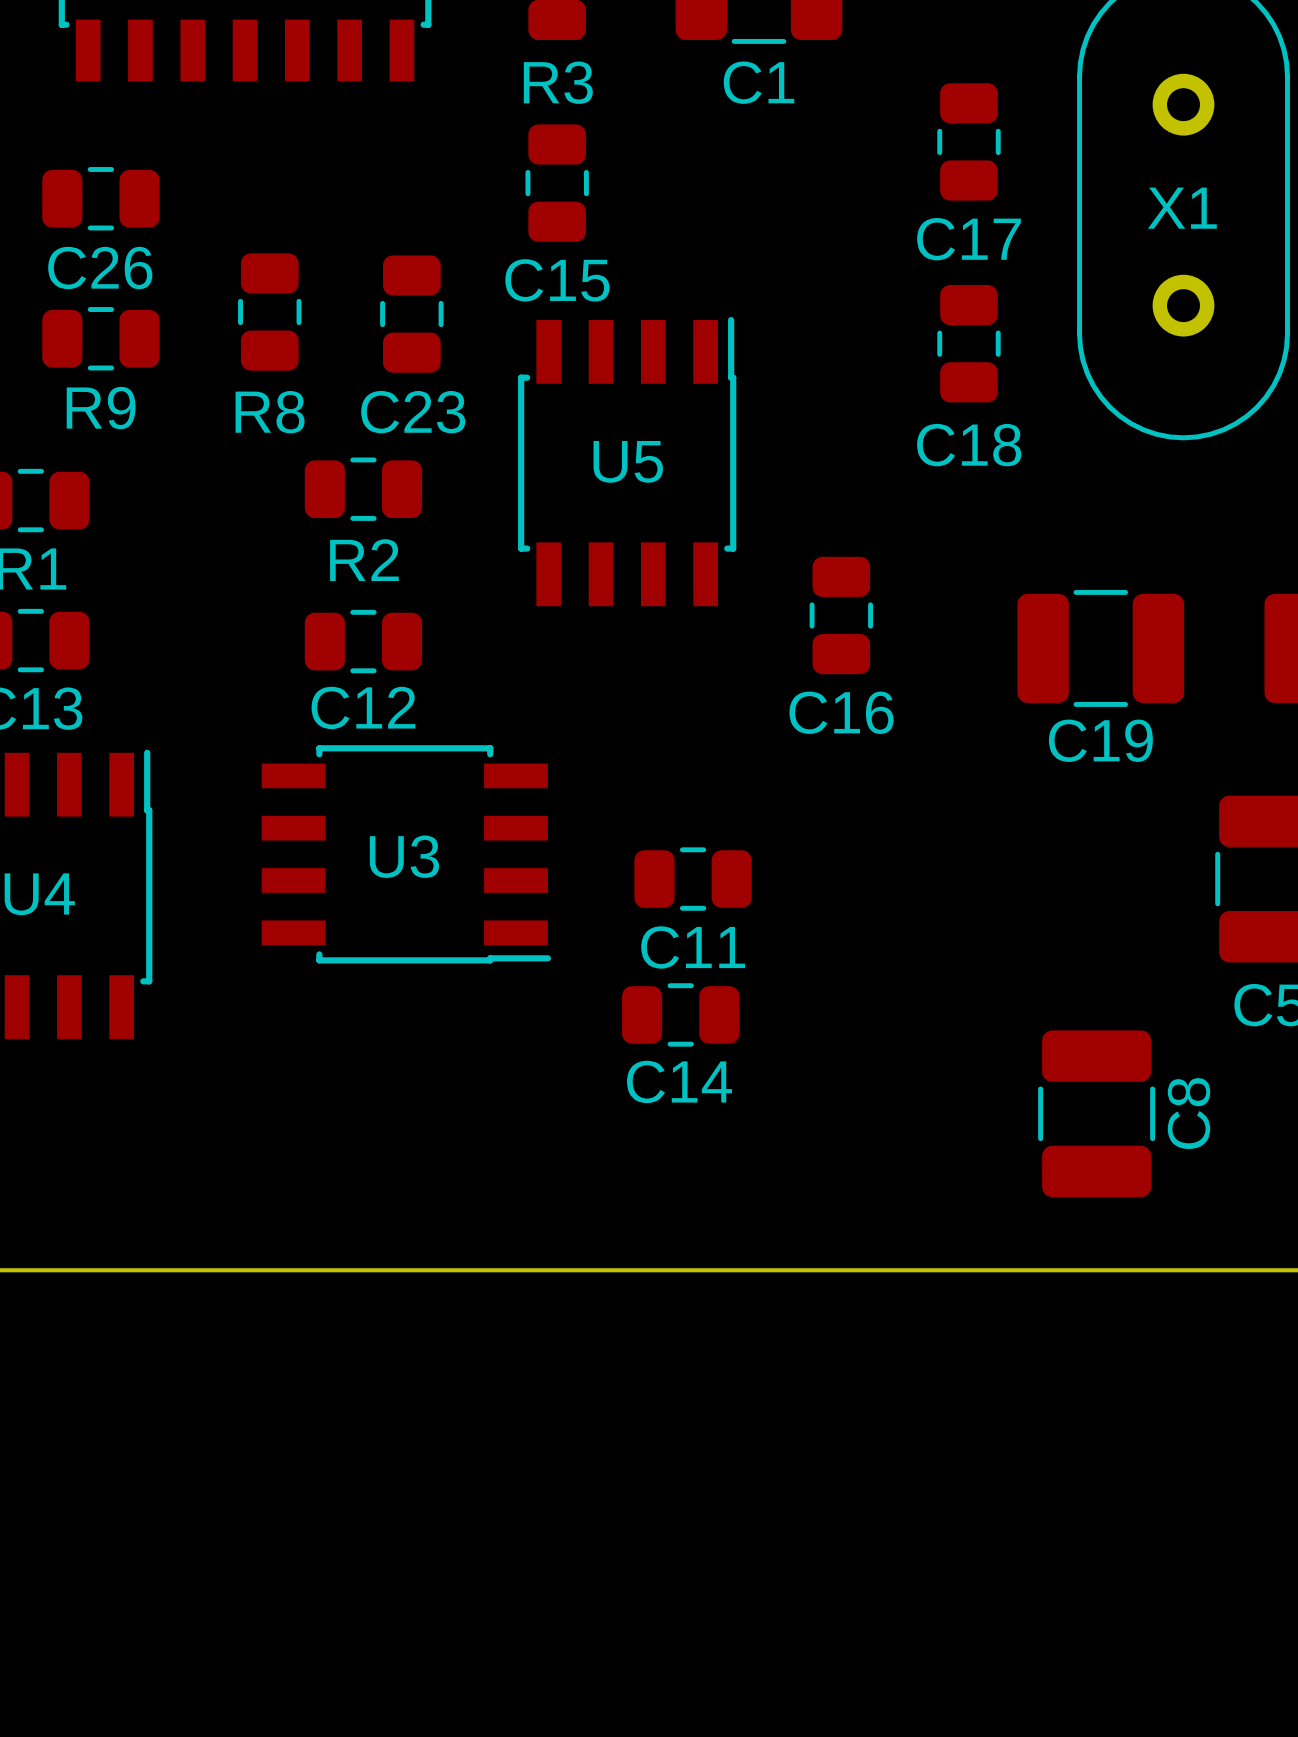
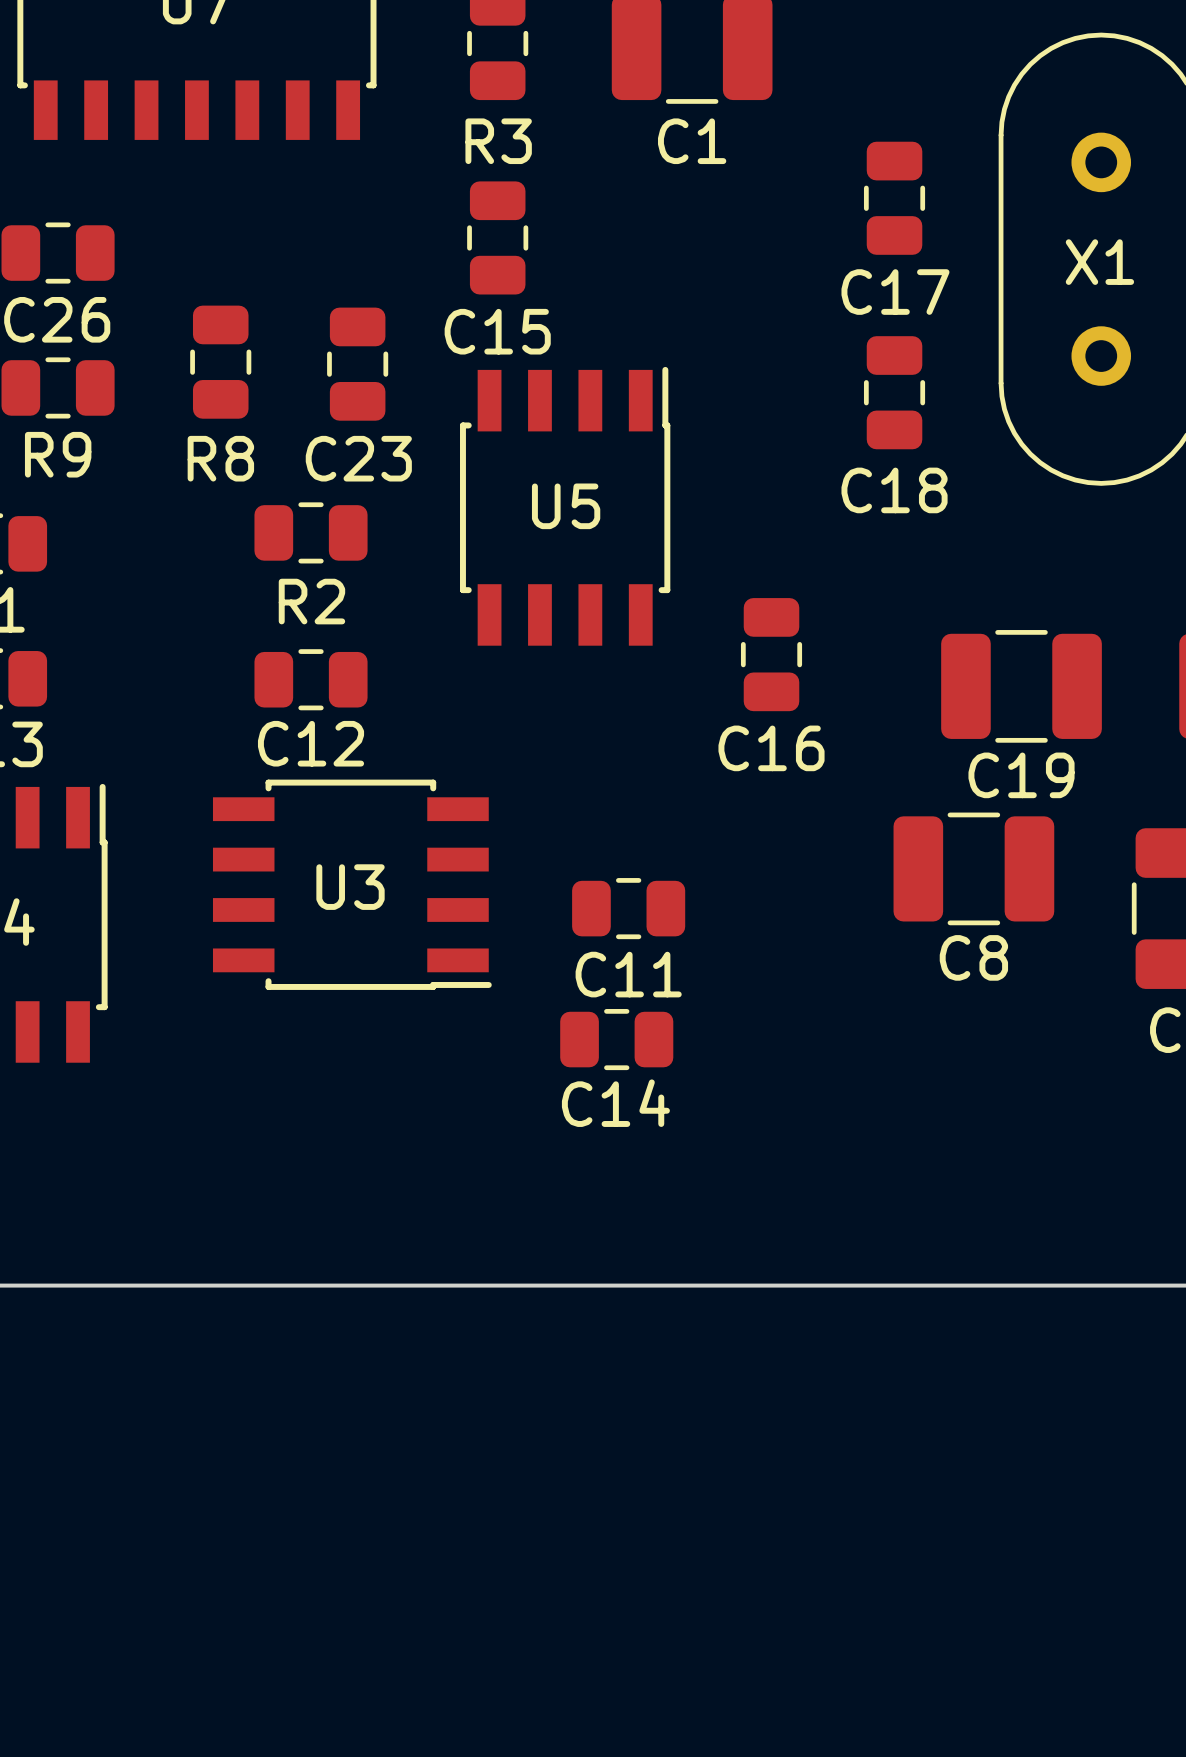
C8 rotation: 0° (1096, 1113) -> 90° clockwise (973, 868)
C8 position: (1096, 1113) -> (973, 868)

